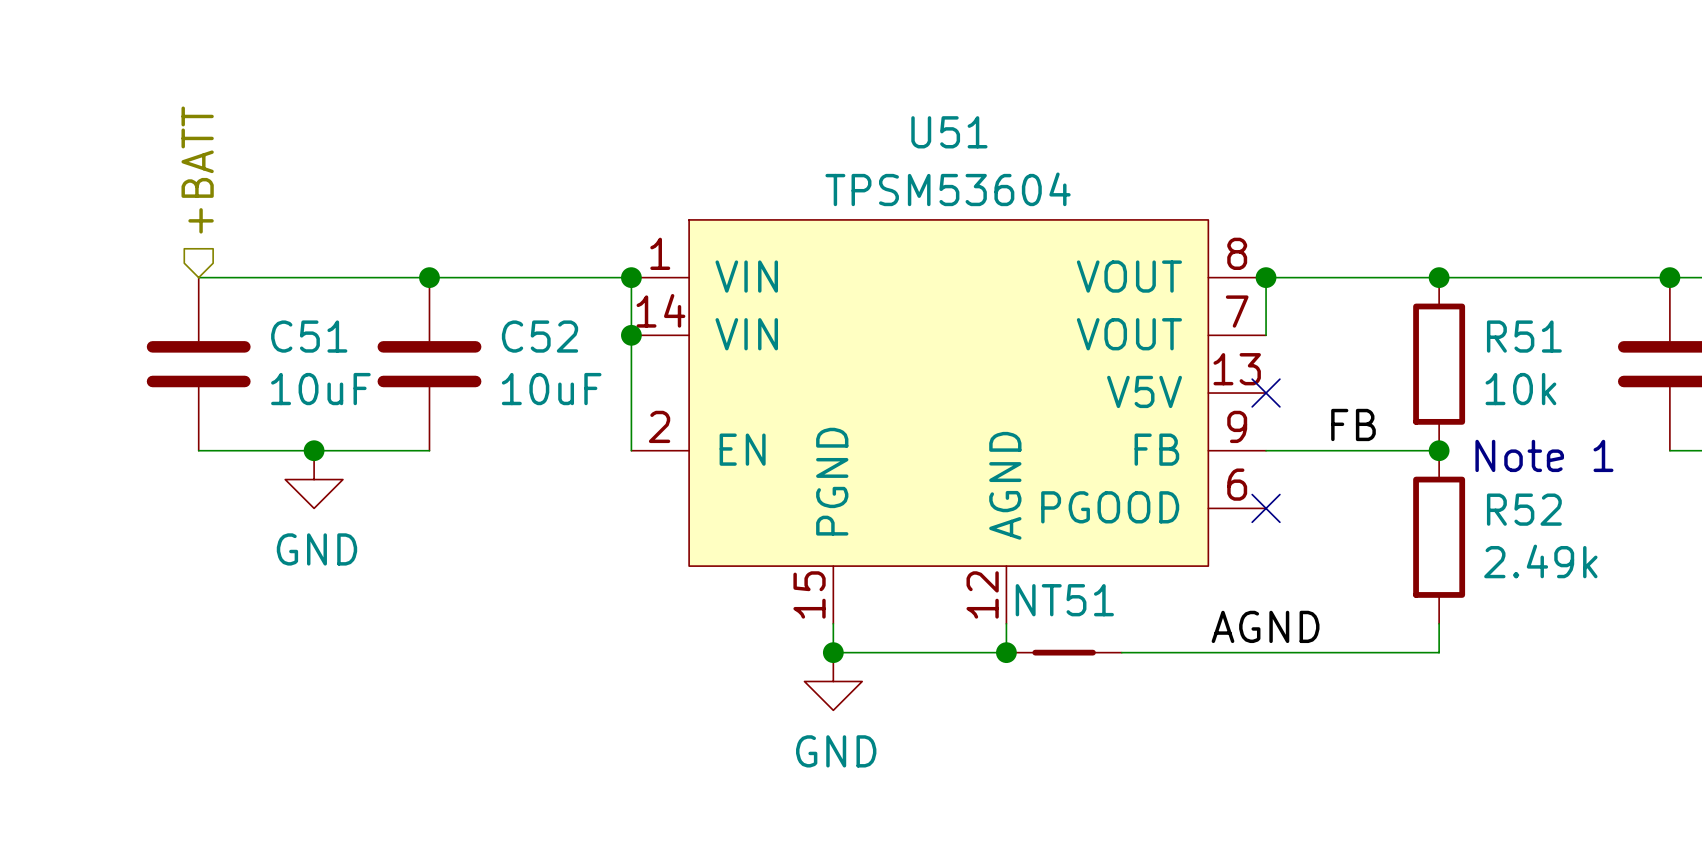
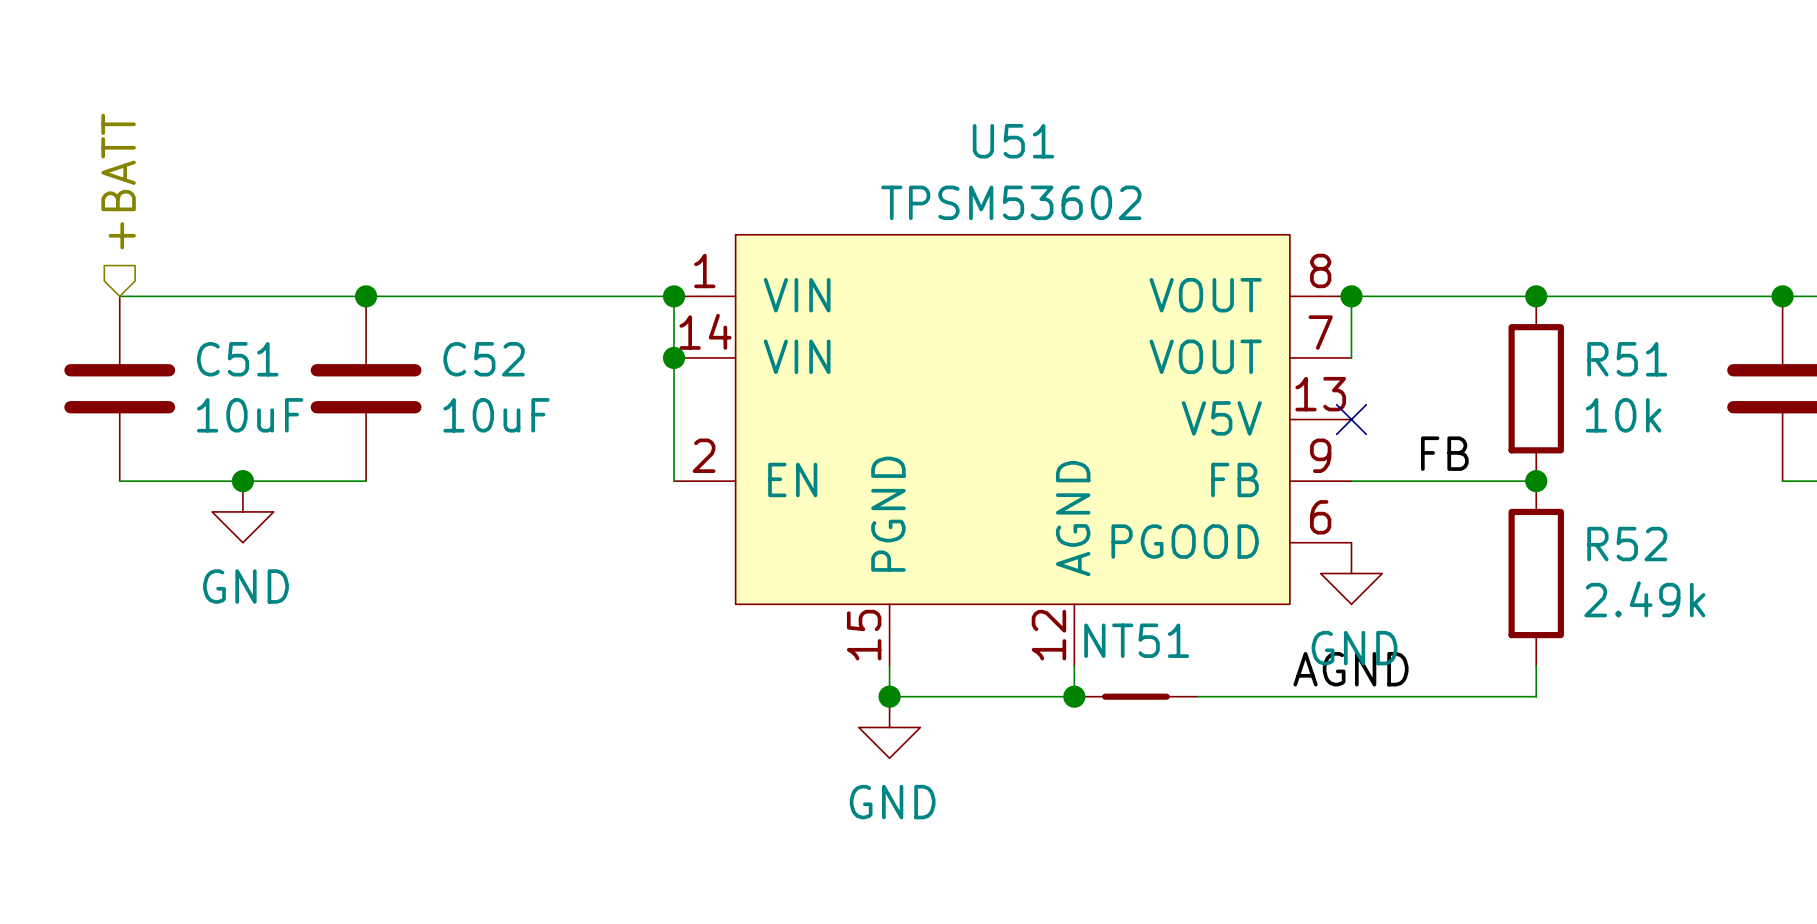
hierarchical label position: +BATT (197, 170) -> +BATT (118, 181)
U51 value: TPSM53604 (948, 189) -> TPSM53602 (1011, 202)
wire: none -> (119, 296) (212, 296)
junction position: (429, 277) -> (366, 296)
C51 position: (198, 364) -> (119, 388)
C52 position: (429, 364) -> (366, 388)
junction position: (314, 450) -> (242, 481)
wire: (342, 450) (429, 450) -> (119, 481) (212, 481)
text: Note 1 (1544, 455) -> none
power symbol position: GND (314, 479) -> GND (242, 511)
no-connect mark: (1266, 508) -> none
power symbol: none -> GND (1351, 573)

